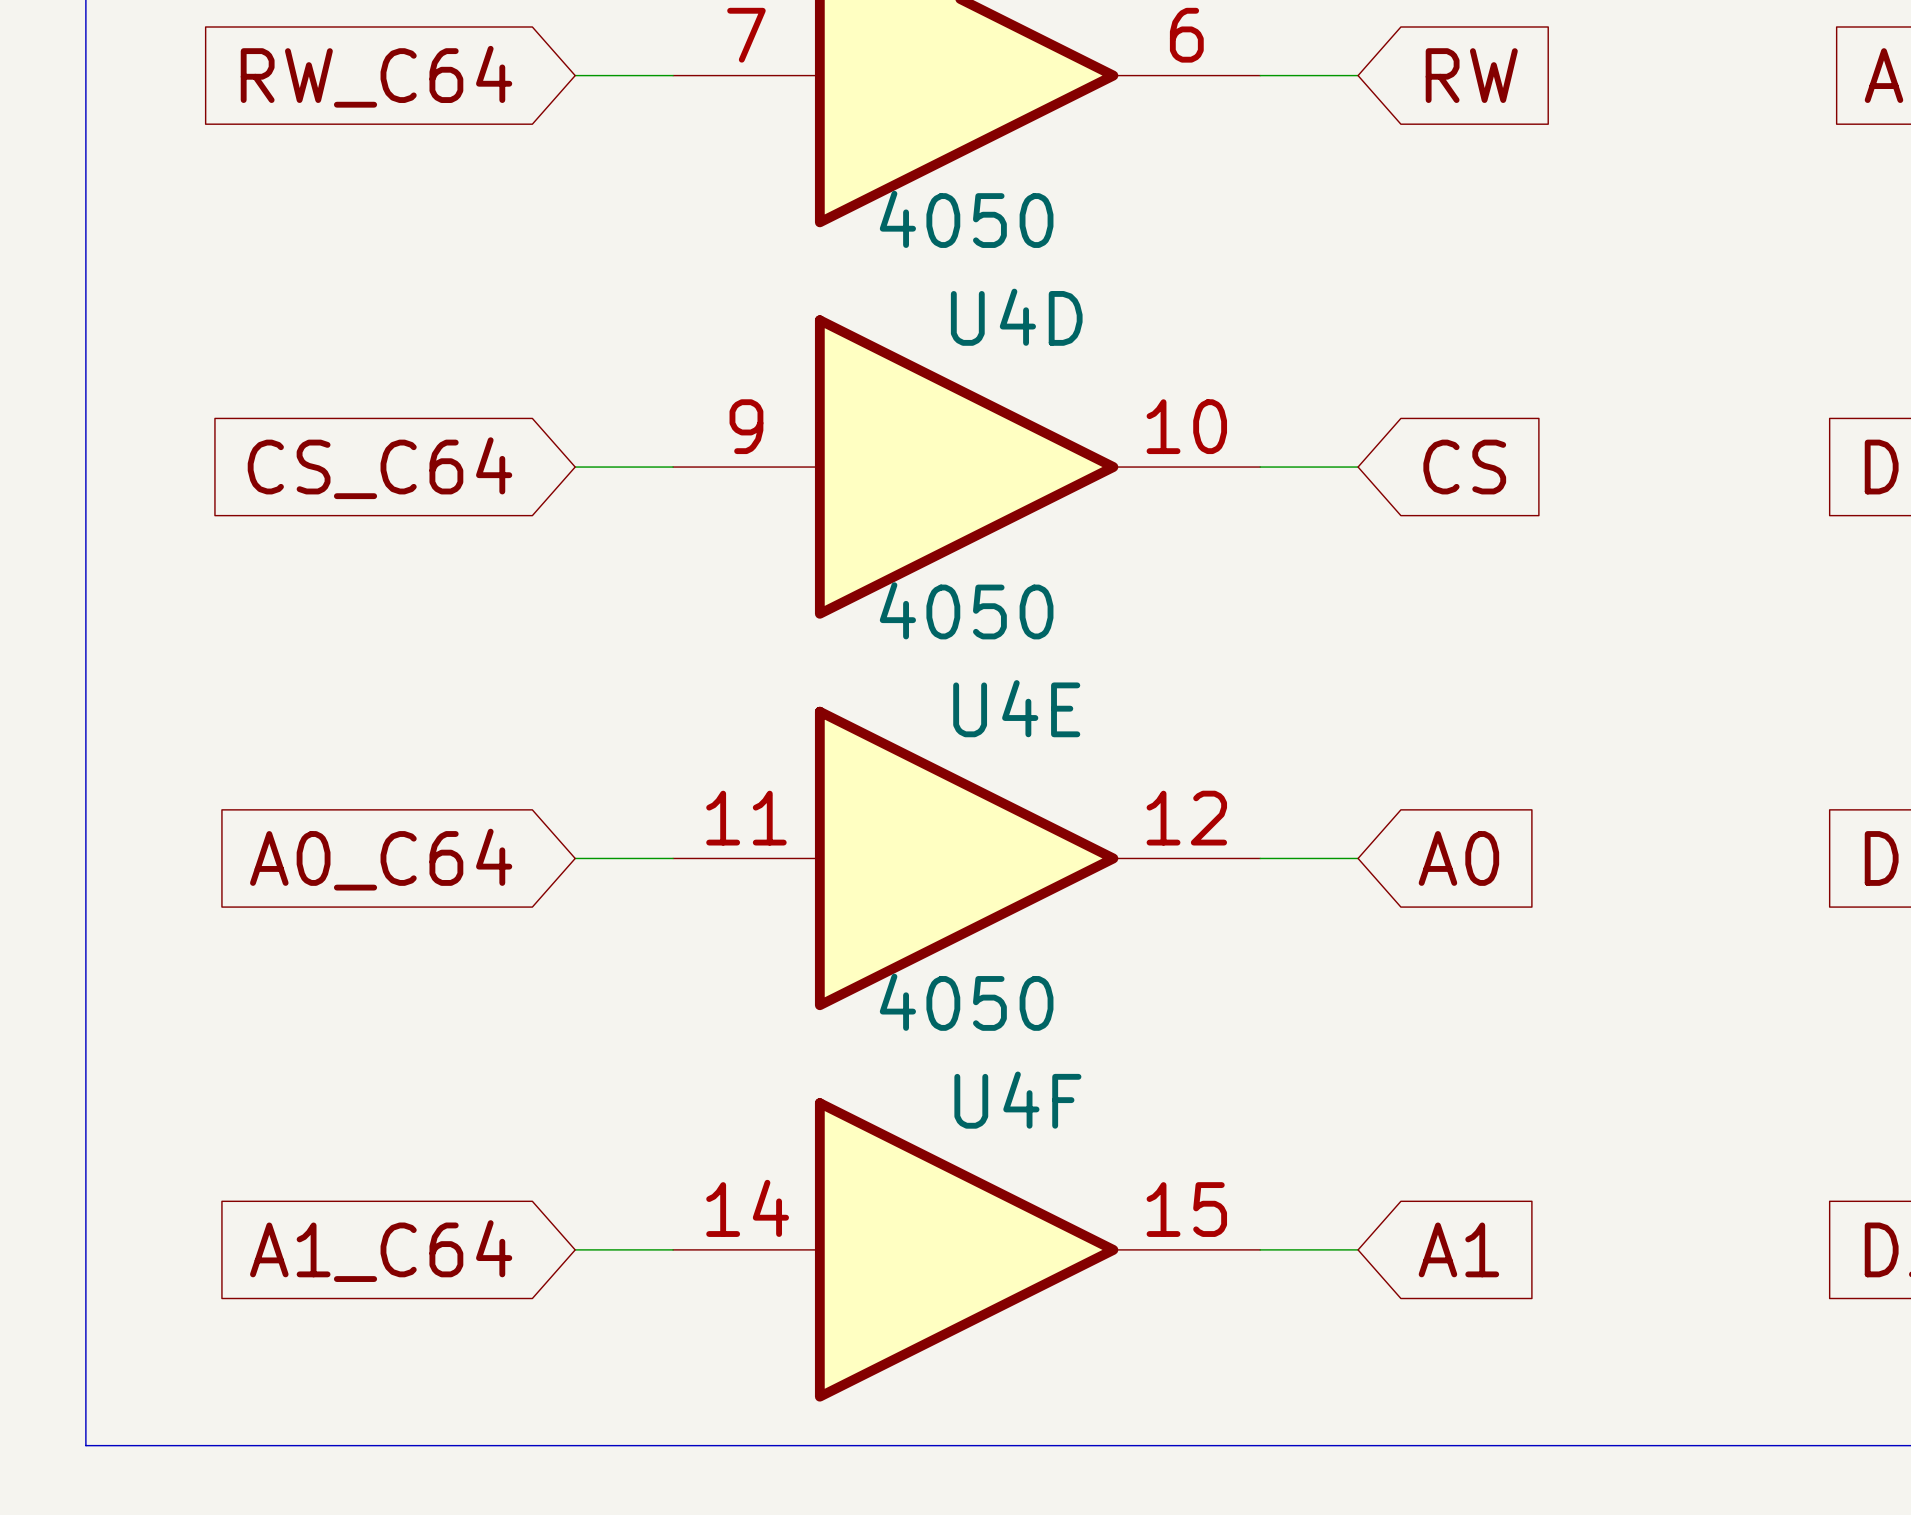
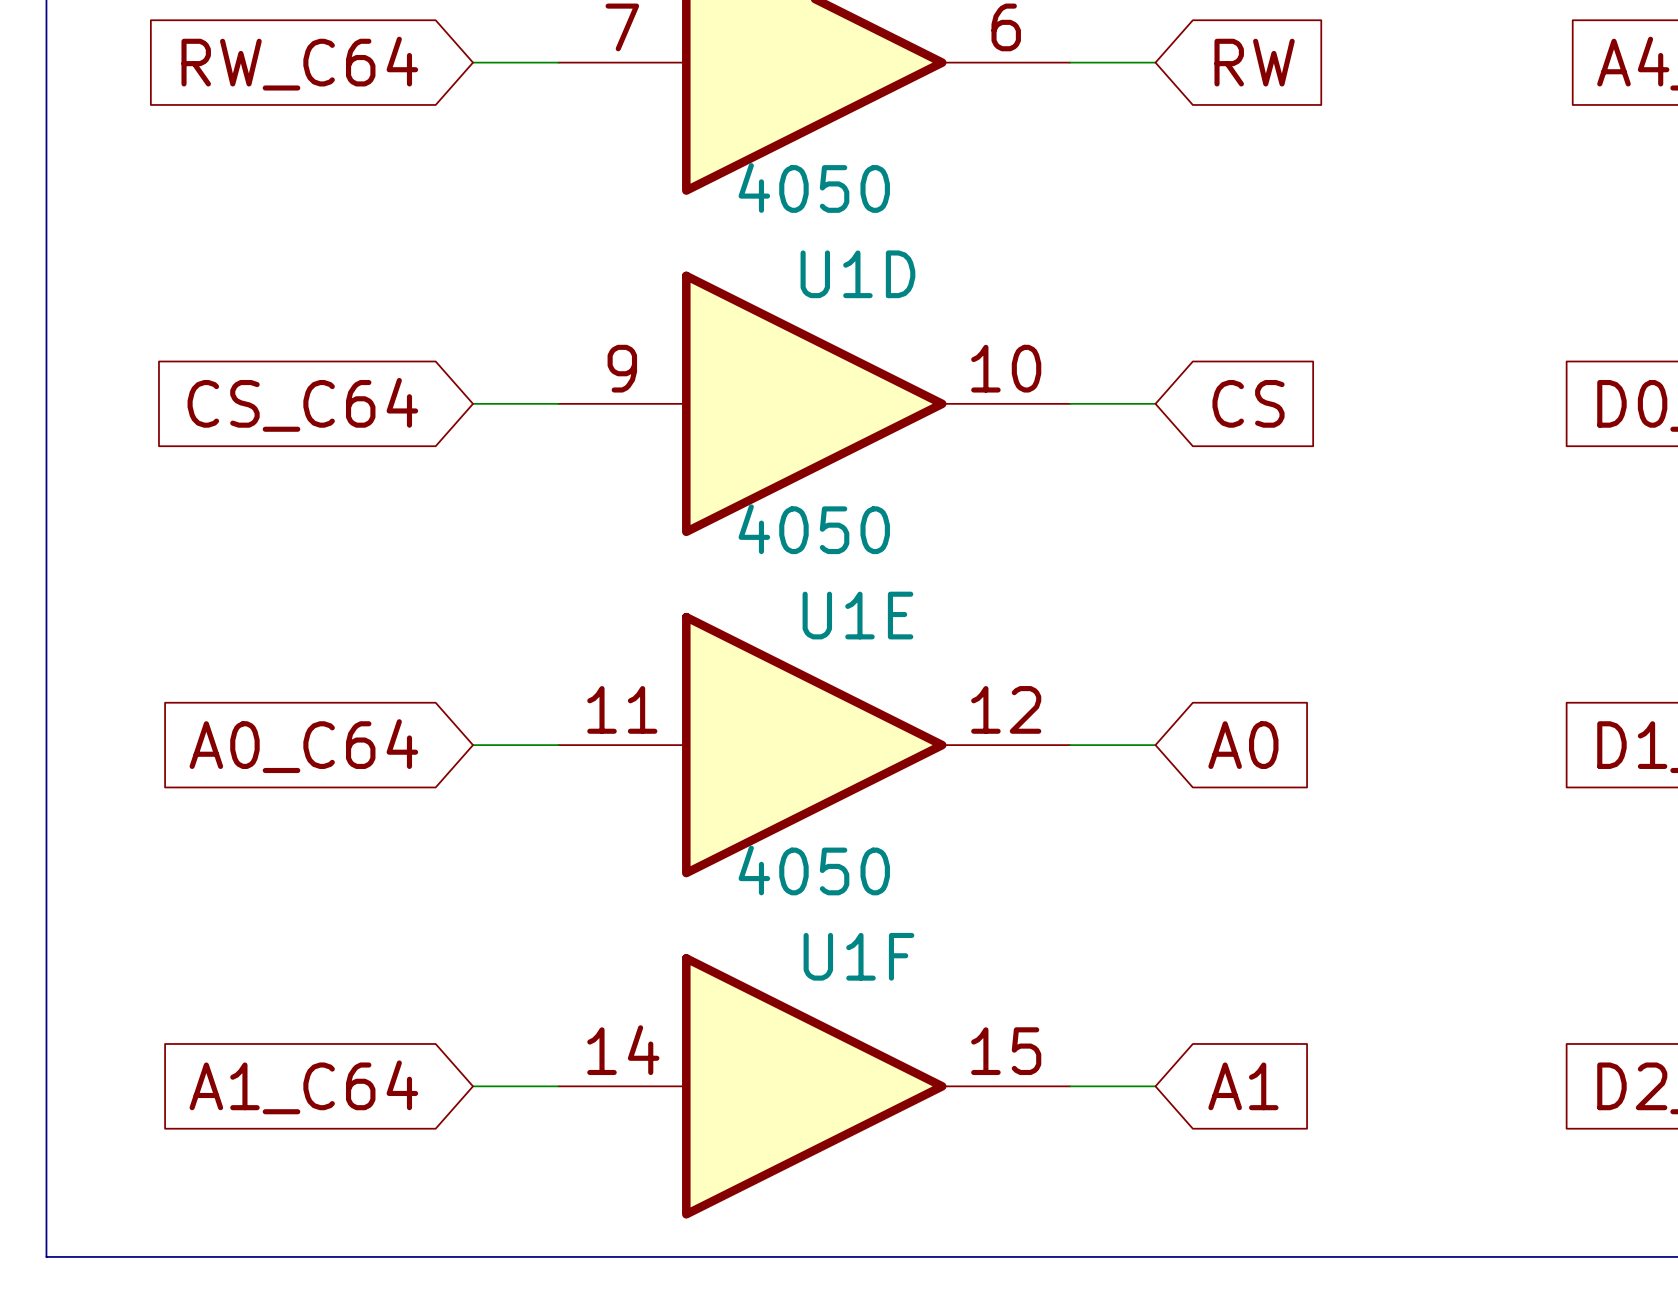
U4D name: U4D (1016, 317) -> U1D (857, 274)
U4E name: U4E (1016, 708) -> U1E (857, 615)
U4F name: U4F (1017, 1100) -> U1F (858, 956)

